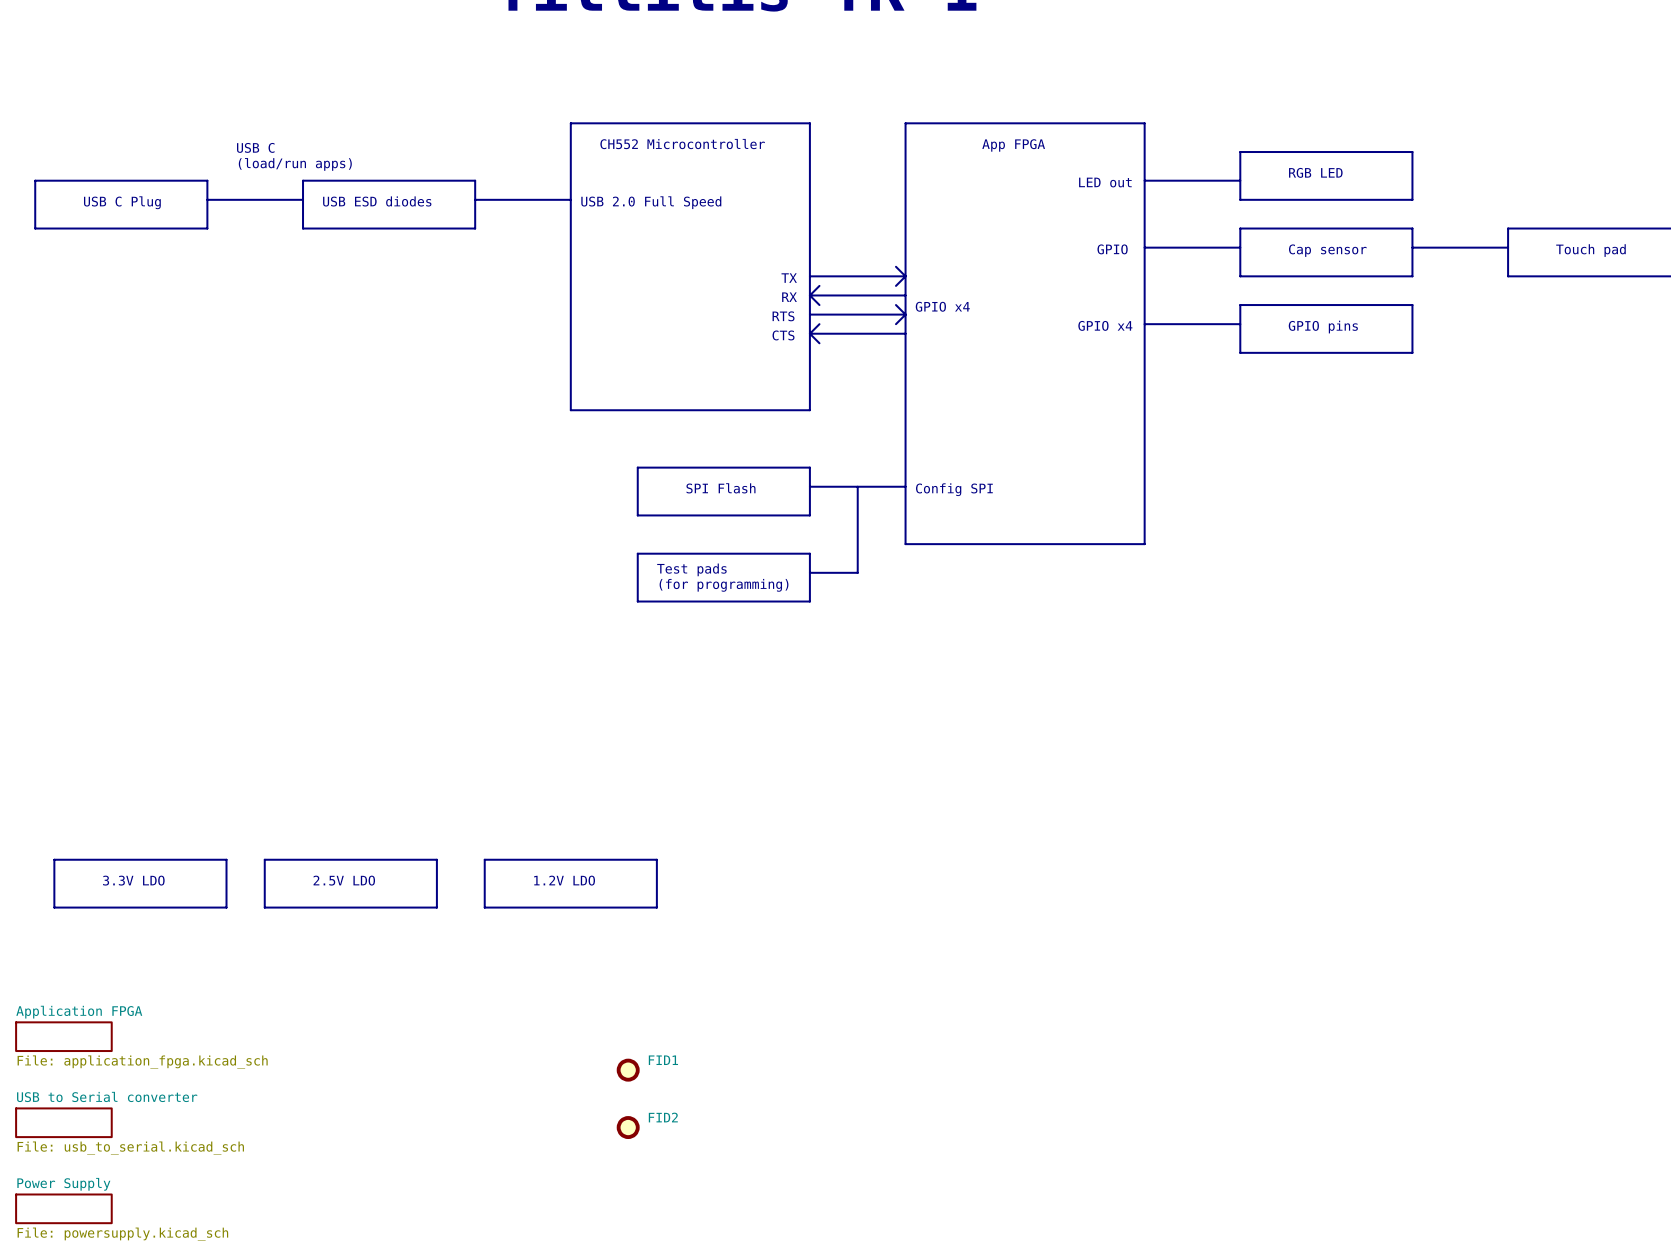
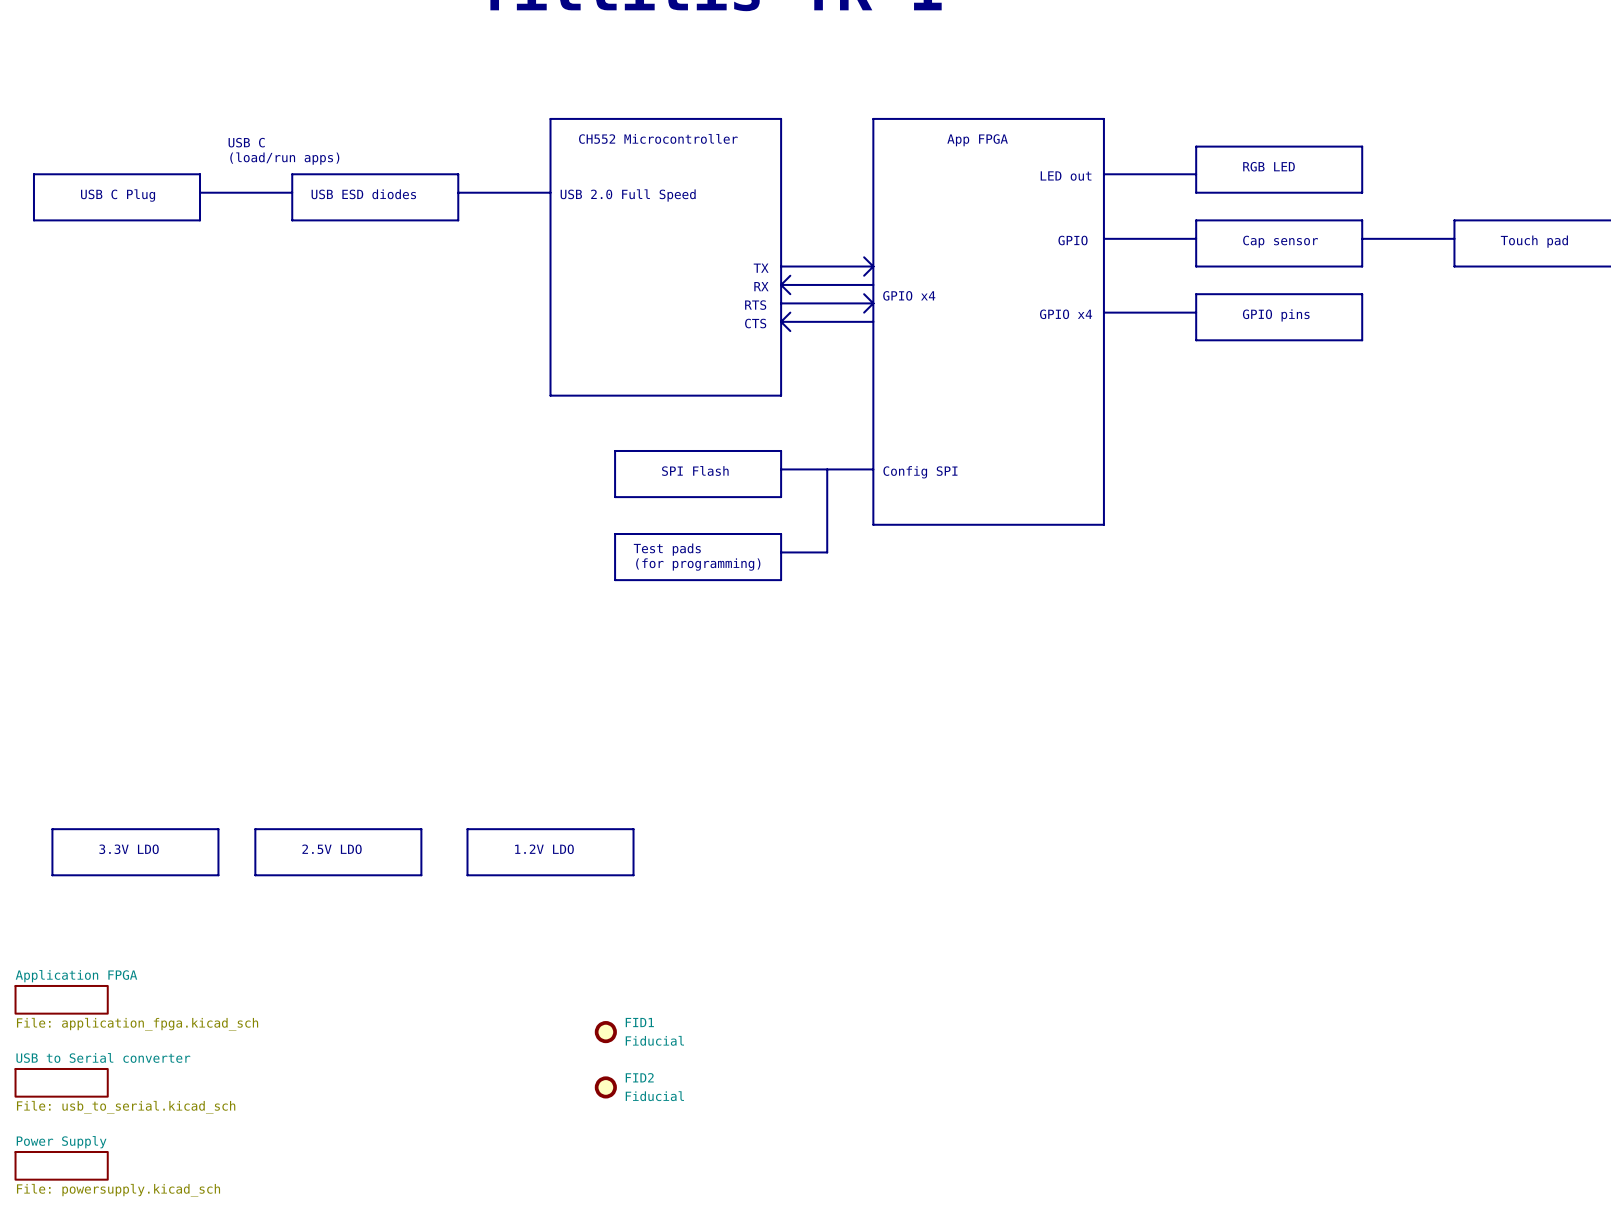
FID1 value: none -> Fiducial (654, 1040)
FID2 value: none -> Fiducial (654, 1096)

